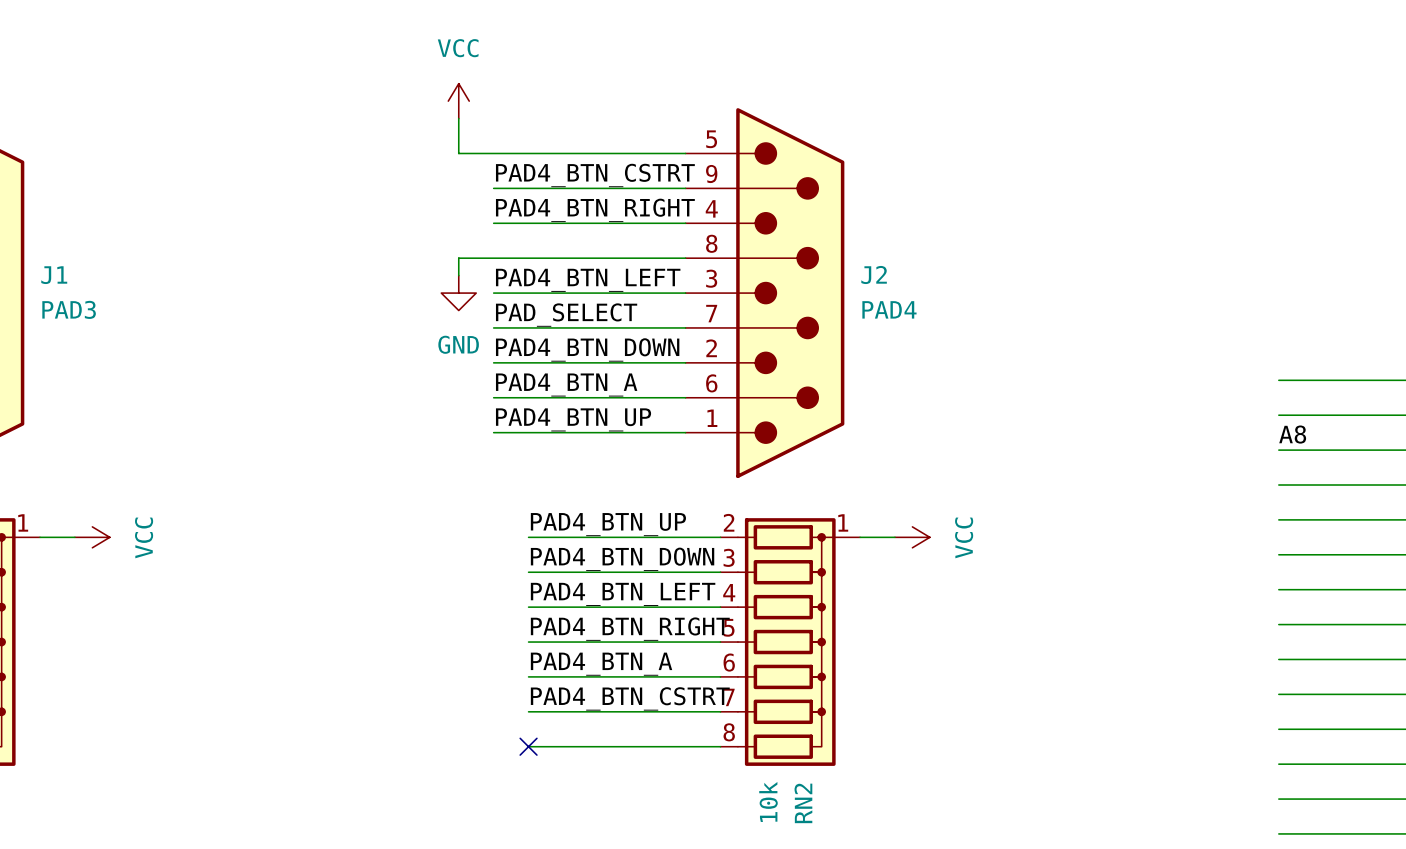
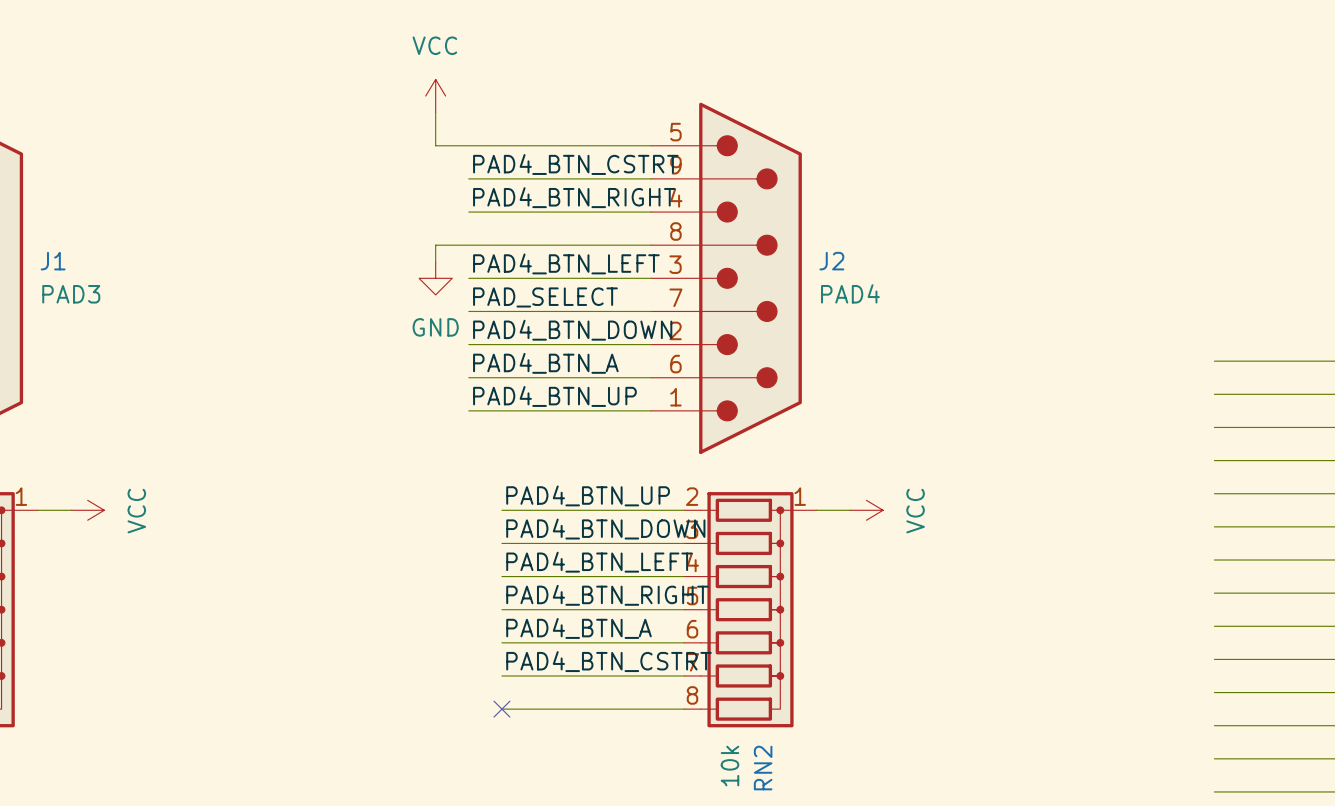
label: A8 (1292, 434) -> none

